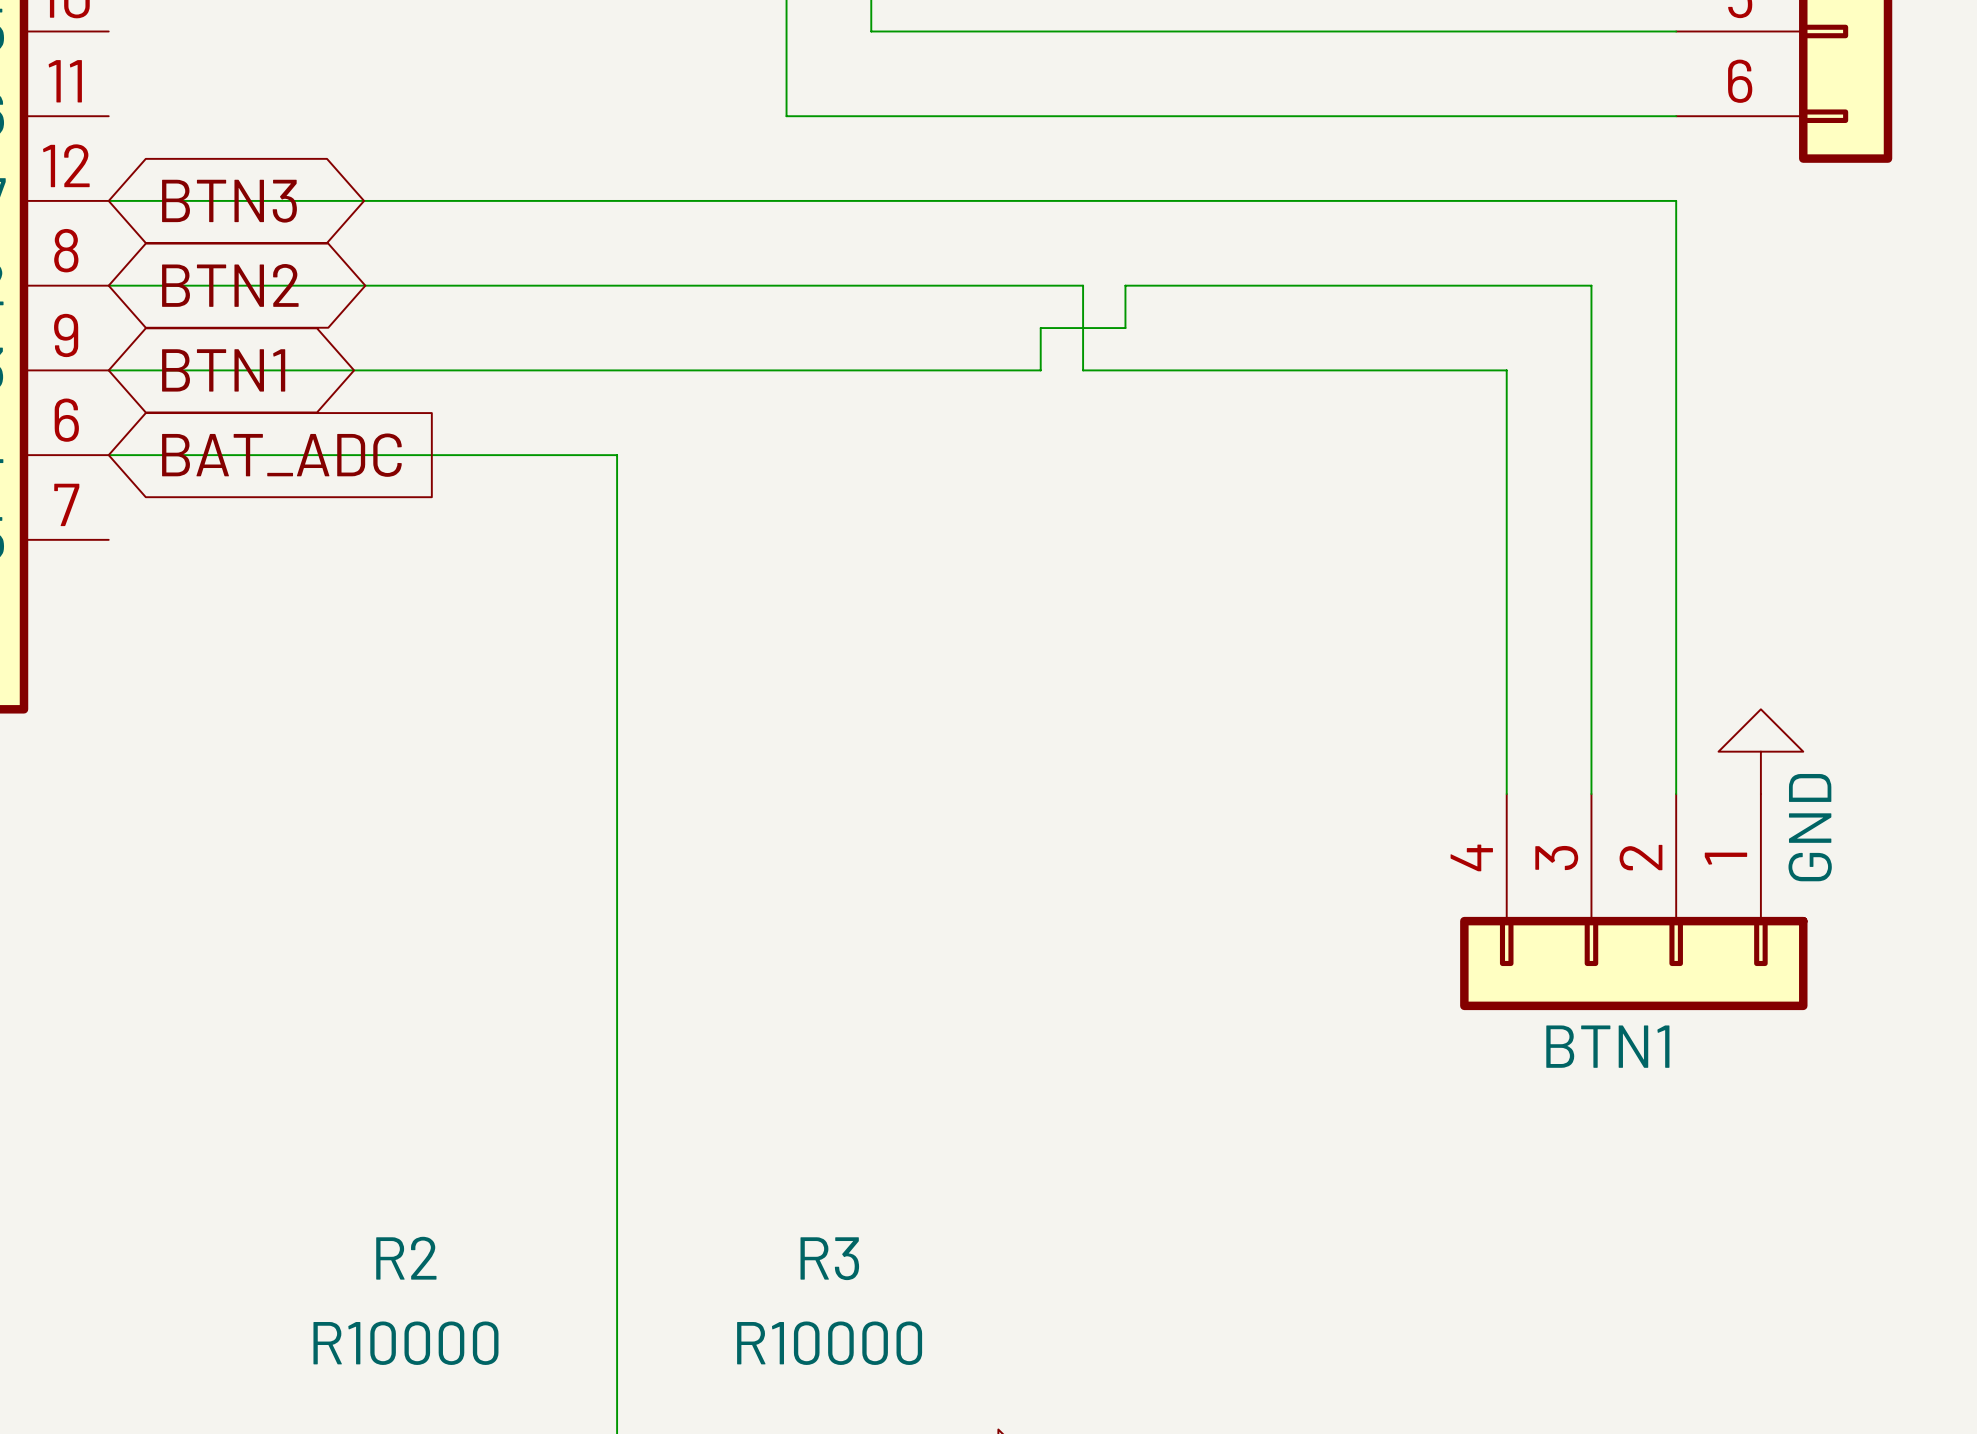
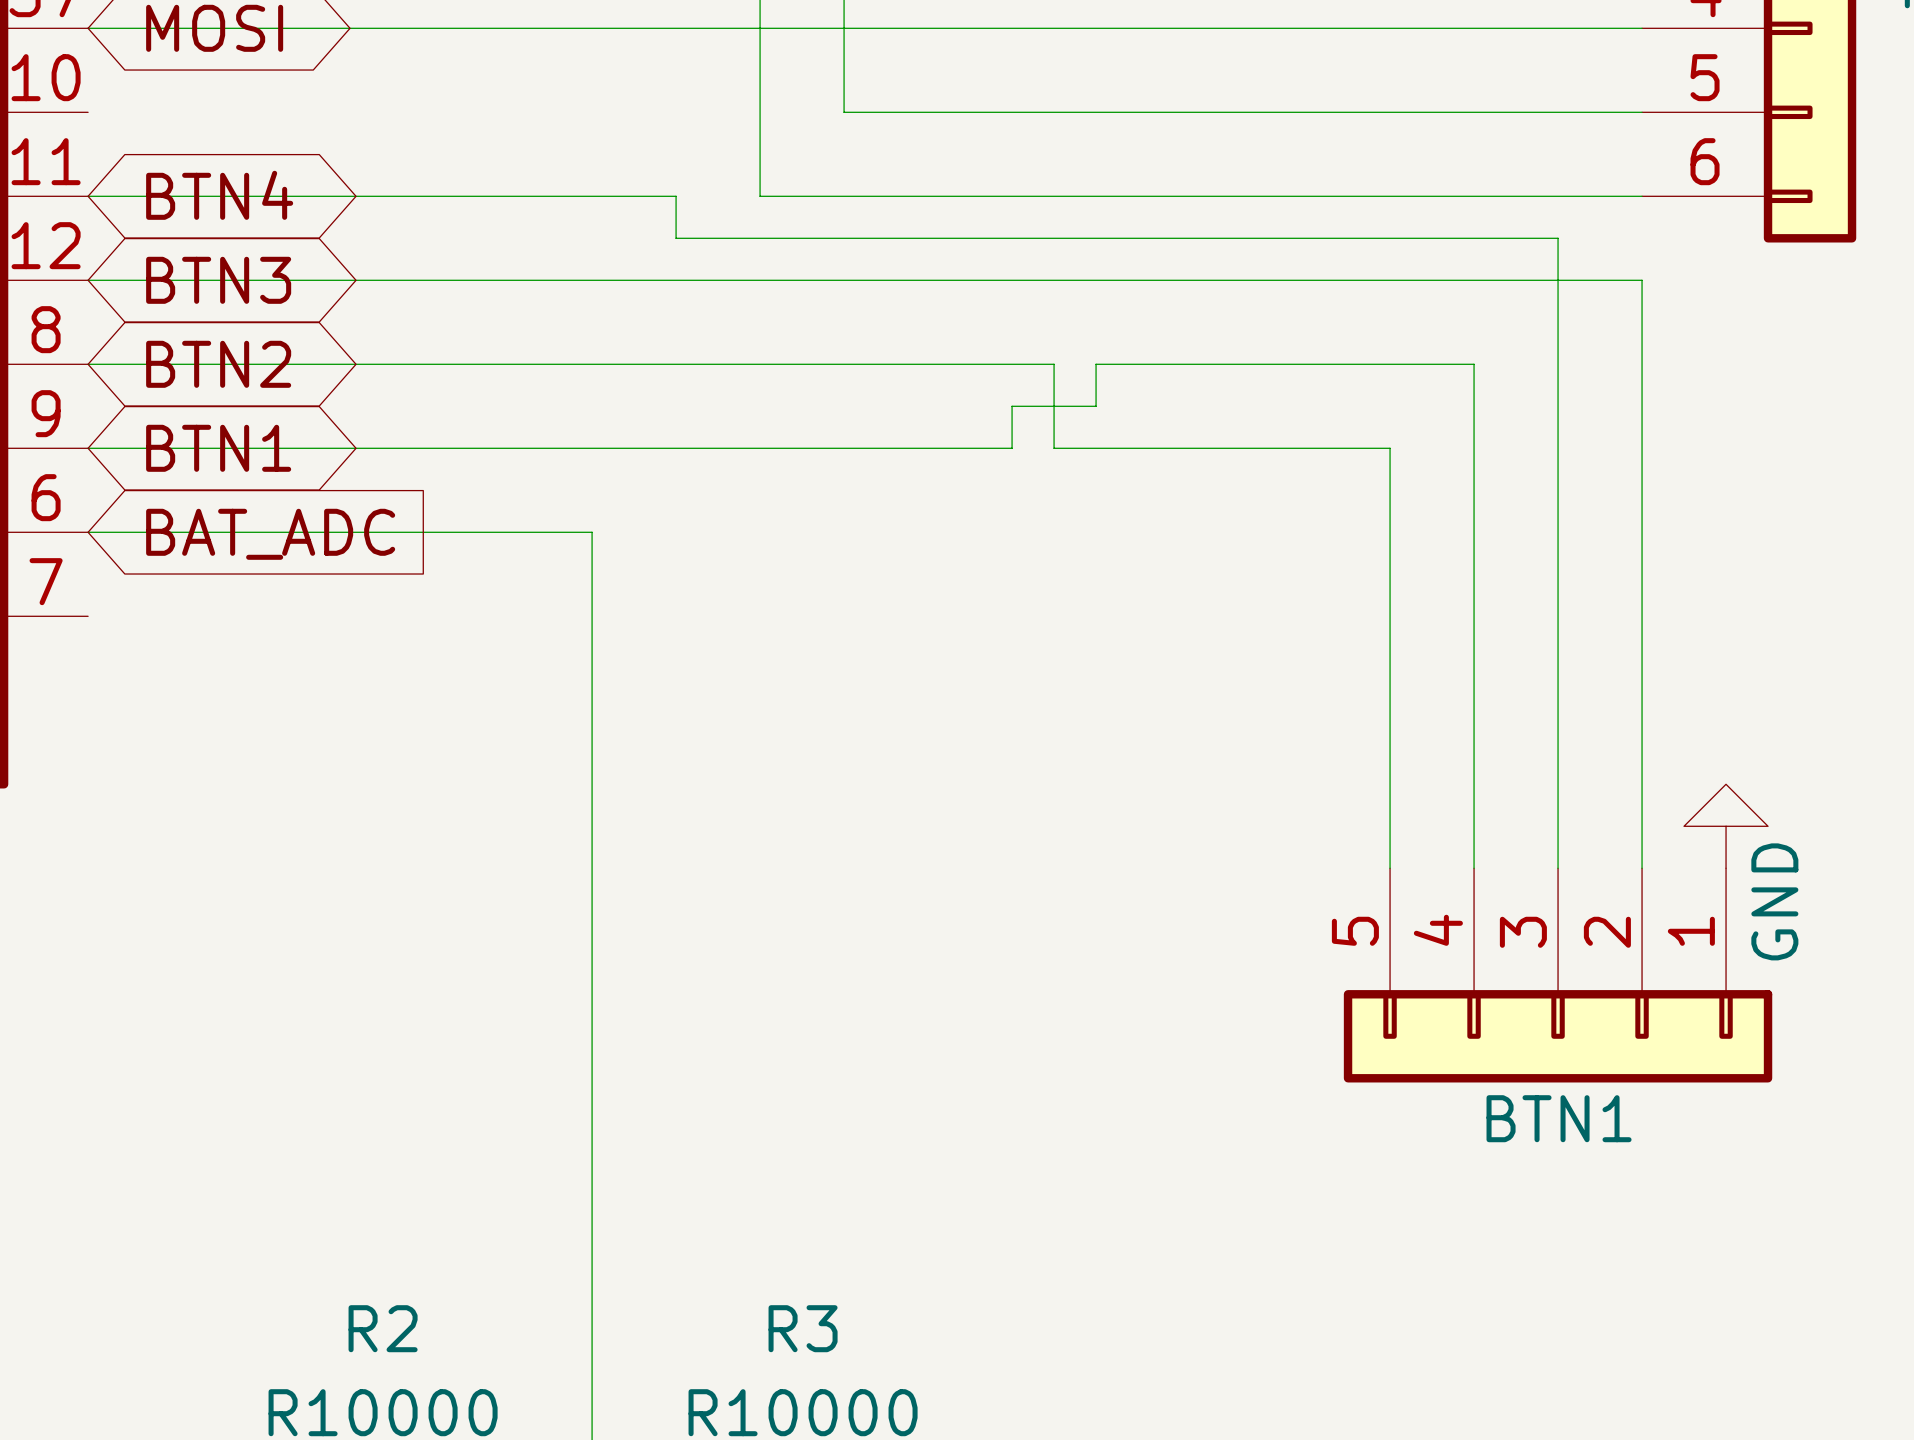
wire: none -> (88, 196) (676, 196) (676, 238) (1558, 238) (1558, 364)
global label: none -> BTN4 (219, 195)
wire: (1506, 285) (1591, 285) -> (1474, 364) (1474, 448)
wire: (1422, 370) (1506, 370) -> (1390, 448) (1390, 868)
BTN1 symbol: [1460, 794, 1808, 1011] -> [1343, 868, 1773, 1083]

